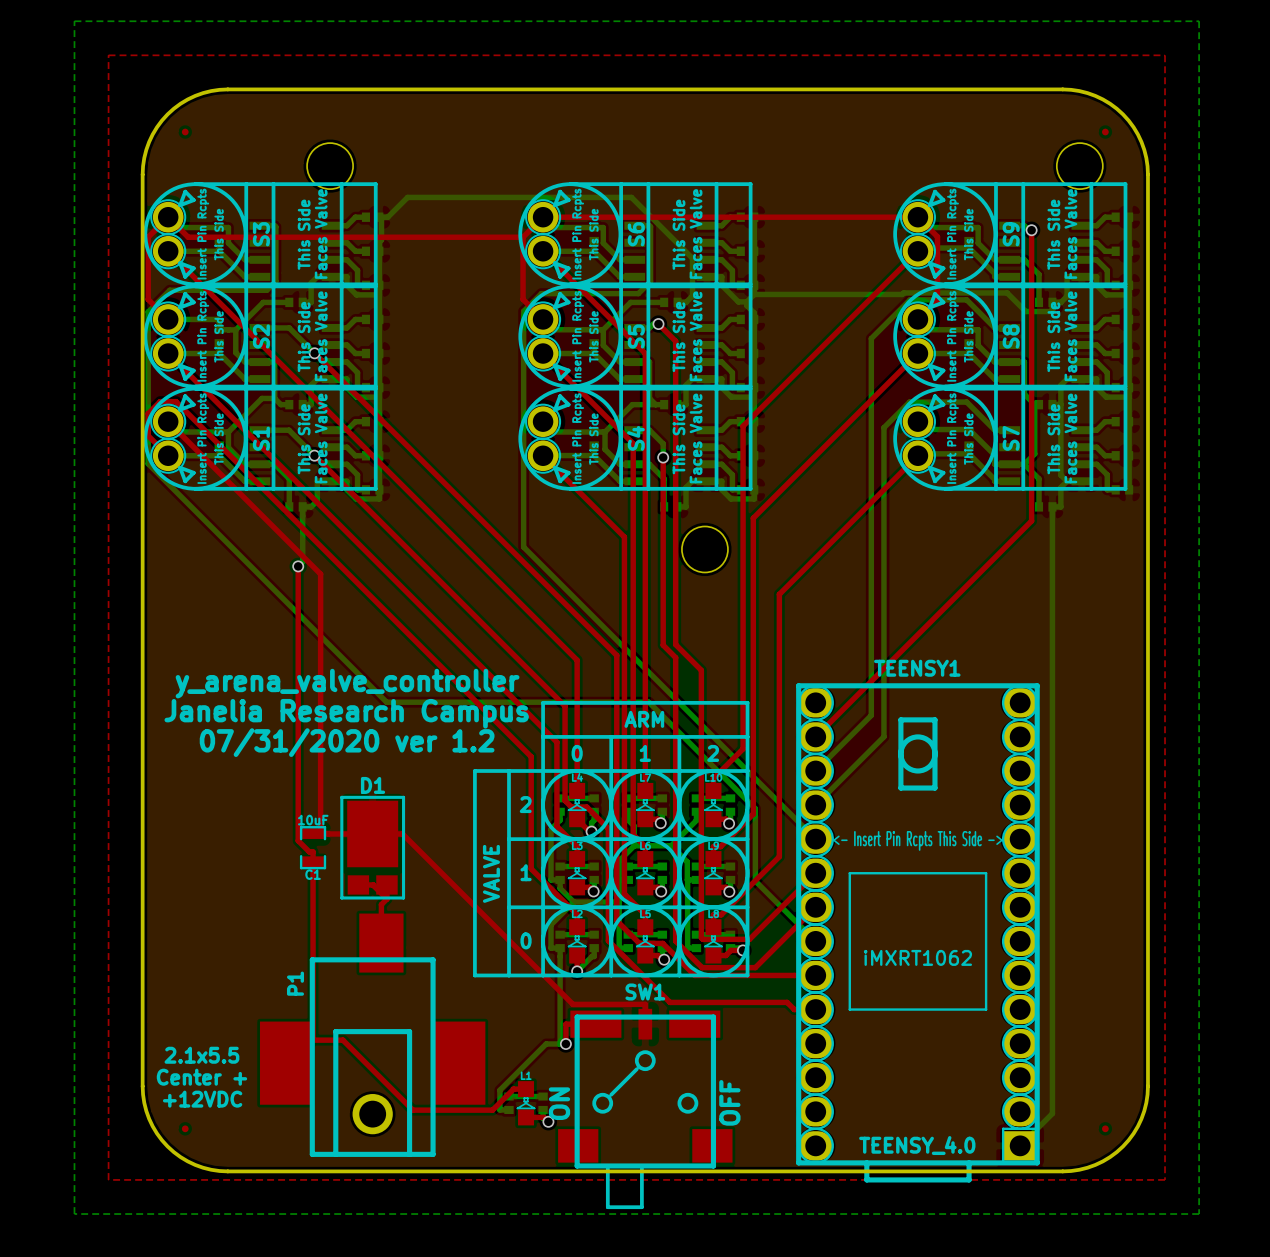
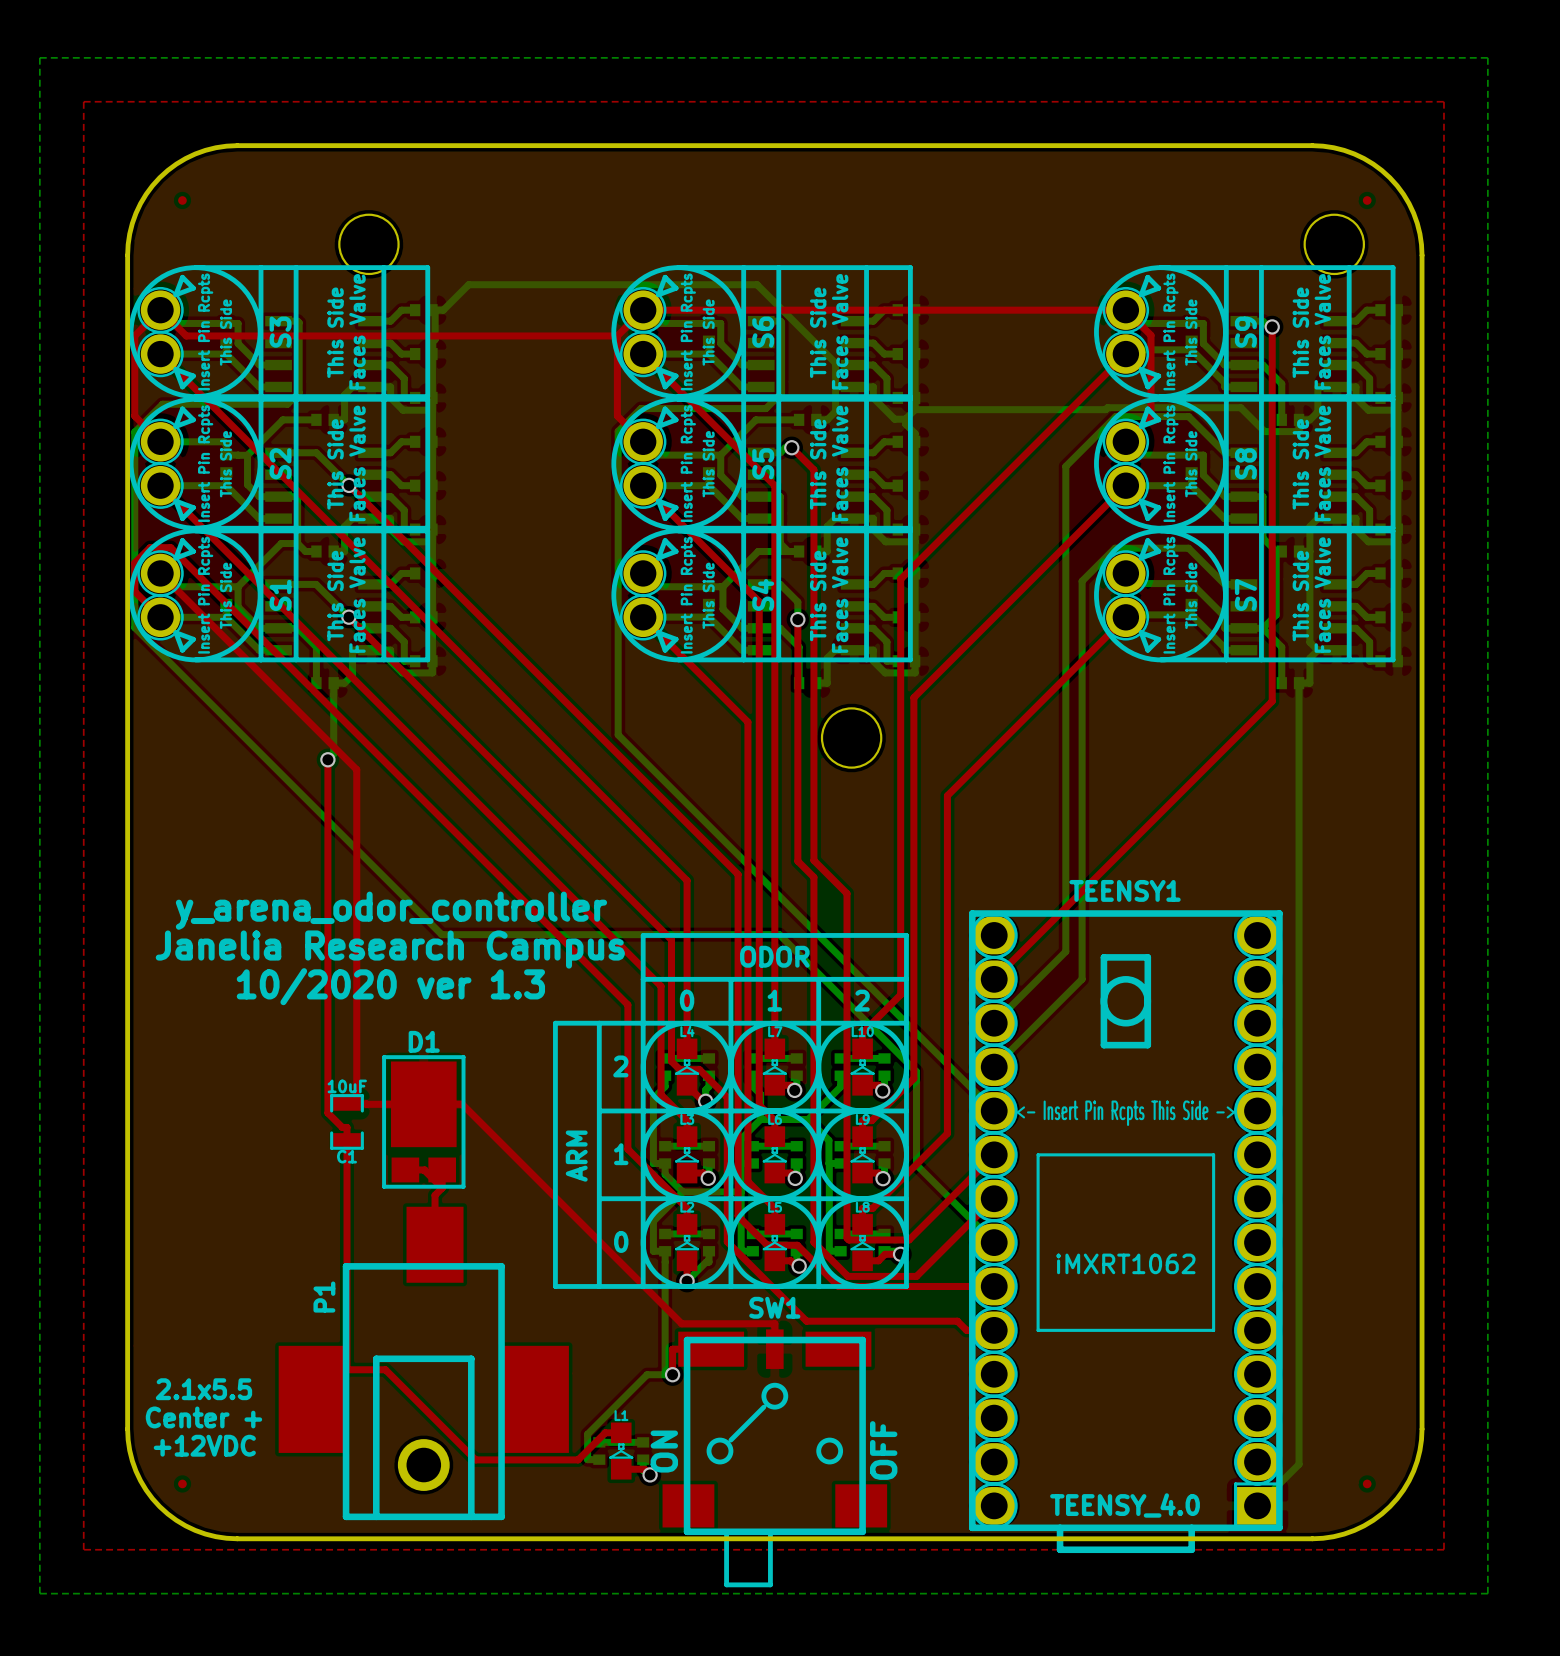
text: y_arena_valve_controller (347, 683) -> y_arena_odor_controller (391, 910)
text: ARM (644, 719) -> ODOR (774, 956)
text: 07/31/2020 ver 1.2 (347, 742) -> 10/2020 ver 1.3 (390, 986)
text: VALVE (491, 873) -> ARM (576, 1156)

